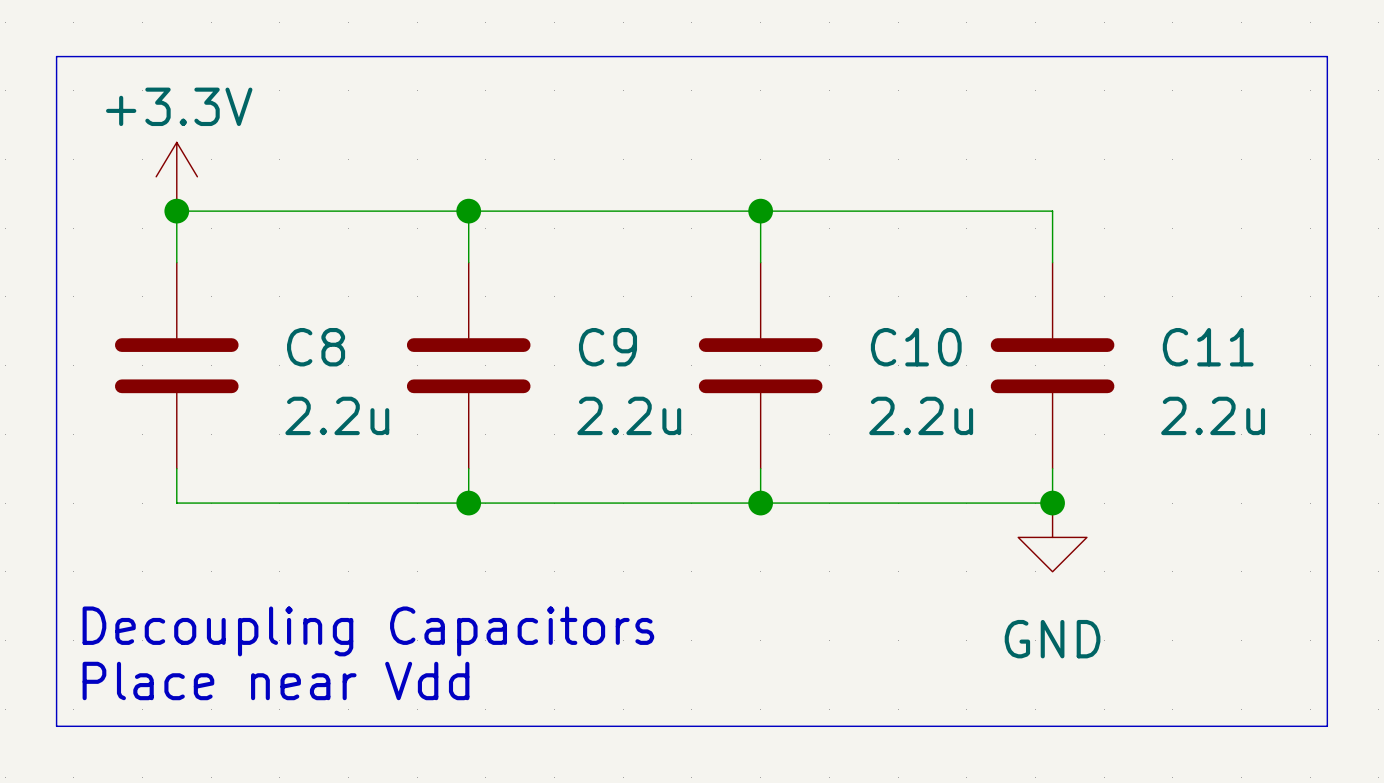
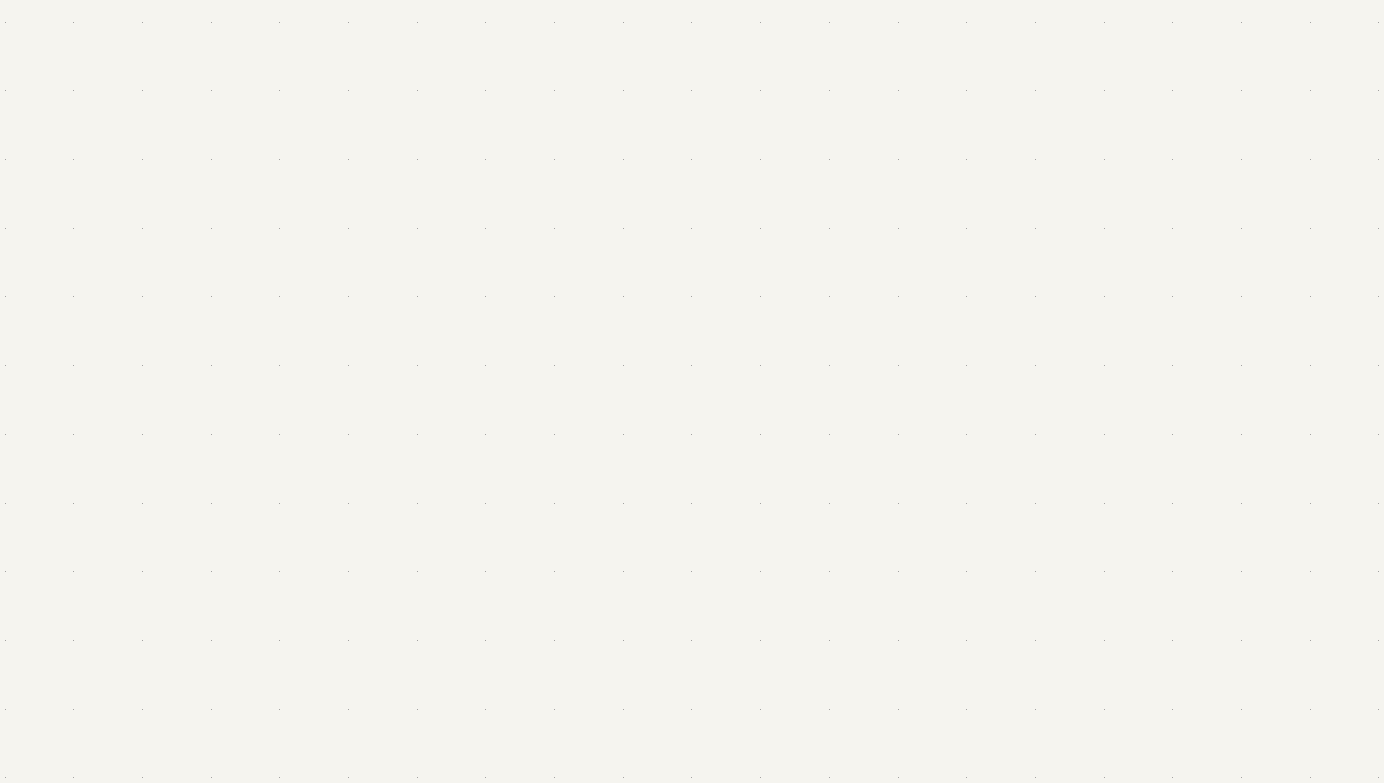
line: (56, 56) (1327, 56) (1327, 726) (56, 726) (56, 56) -> none
power symbol: +3.3V (176, 176) -> none
junction: (176, 211) -> none
wire: (468, 211) (468, 262) -> none
junction: (468, 211) -> none
wire: (760, 211) (760, 262) -> none
junction: (760, 211) -> none
wire: (176, 262) (176, 211) (1052, 211) (1052, 262) -> none
C8: 2.2u (176, 365) -> none
C9: 2.2u (468, 365) -> none
C10: 2.2u (760, 365) -> none
C11: 2.2u (1052, 365) -> none
wire: (176, 468) (176, 503) (1052, 503) (1052, 468) -> none
wire: (468, 468) (468, 503) -> none
wire: (760, 468) (760, 503) -> none
junction: (468, 503) -> none
junction: (760, 503) -> none
junction: (1052, 503) -> none
power symbol: GND (1052, 537) -> none
text: Decoupling Capacitors (368, 631) -> none
text: Place near Vdd (275, 680) -> none

